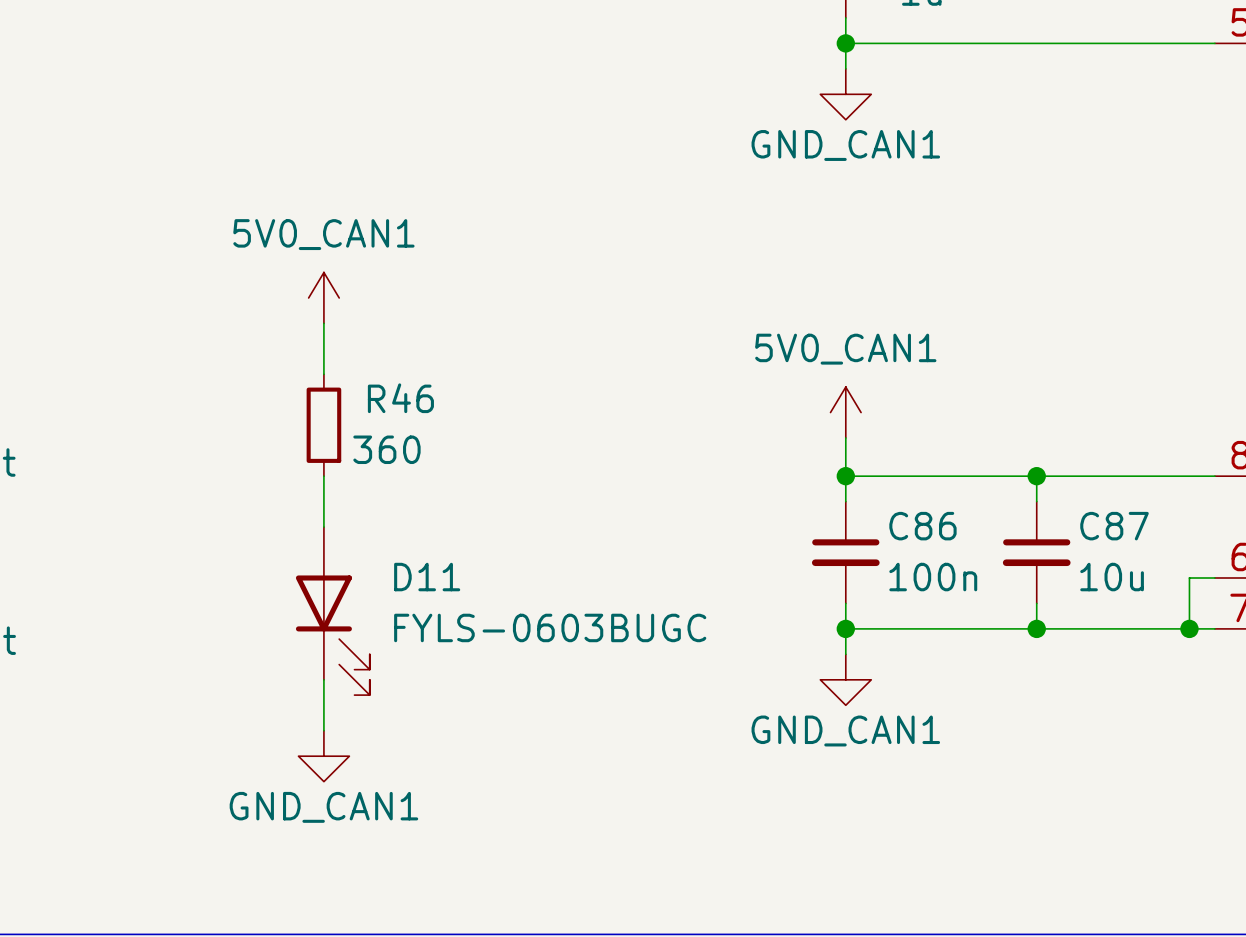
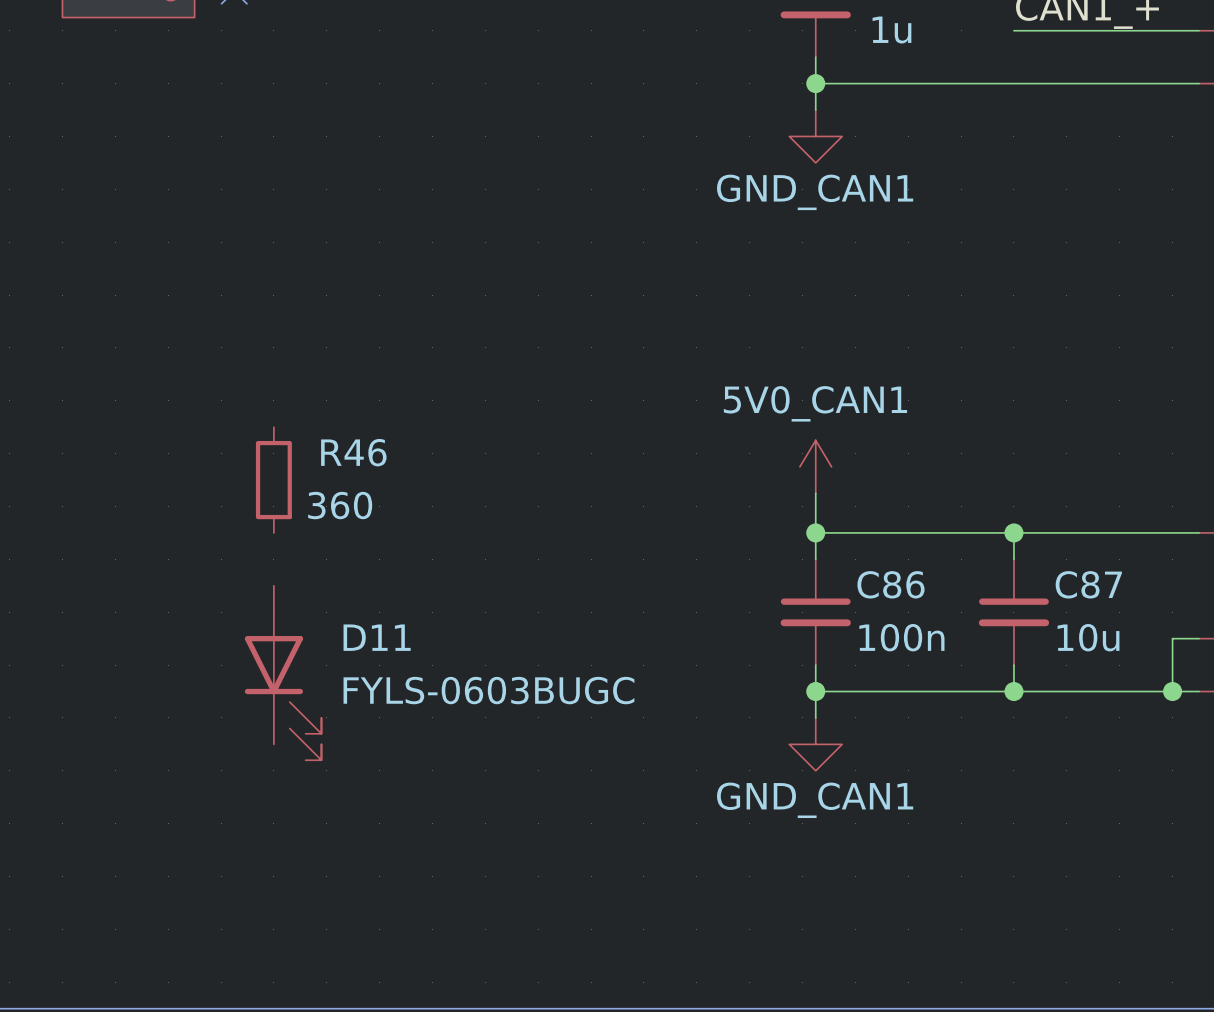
power symbol: 5V0_CAN1 (323, 297) -> none
wire: (323, 323) (323, 374) -> none
wire: (323, 476) (323, 527) -> none
wire: (323, 679) (323, 730) -> none
power symbol: GND_CAN1 (323, 756) -> none

